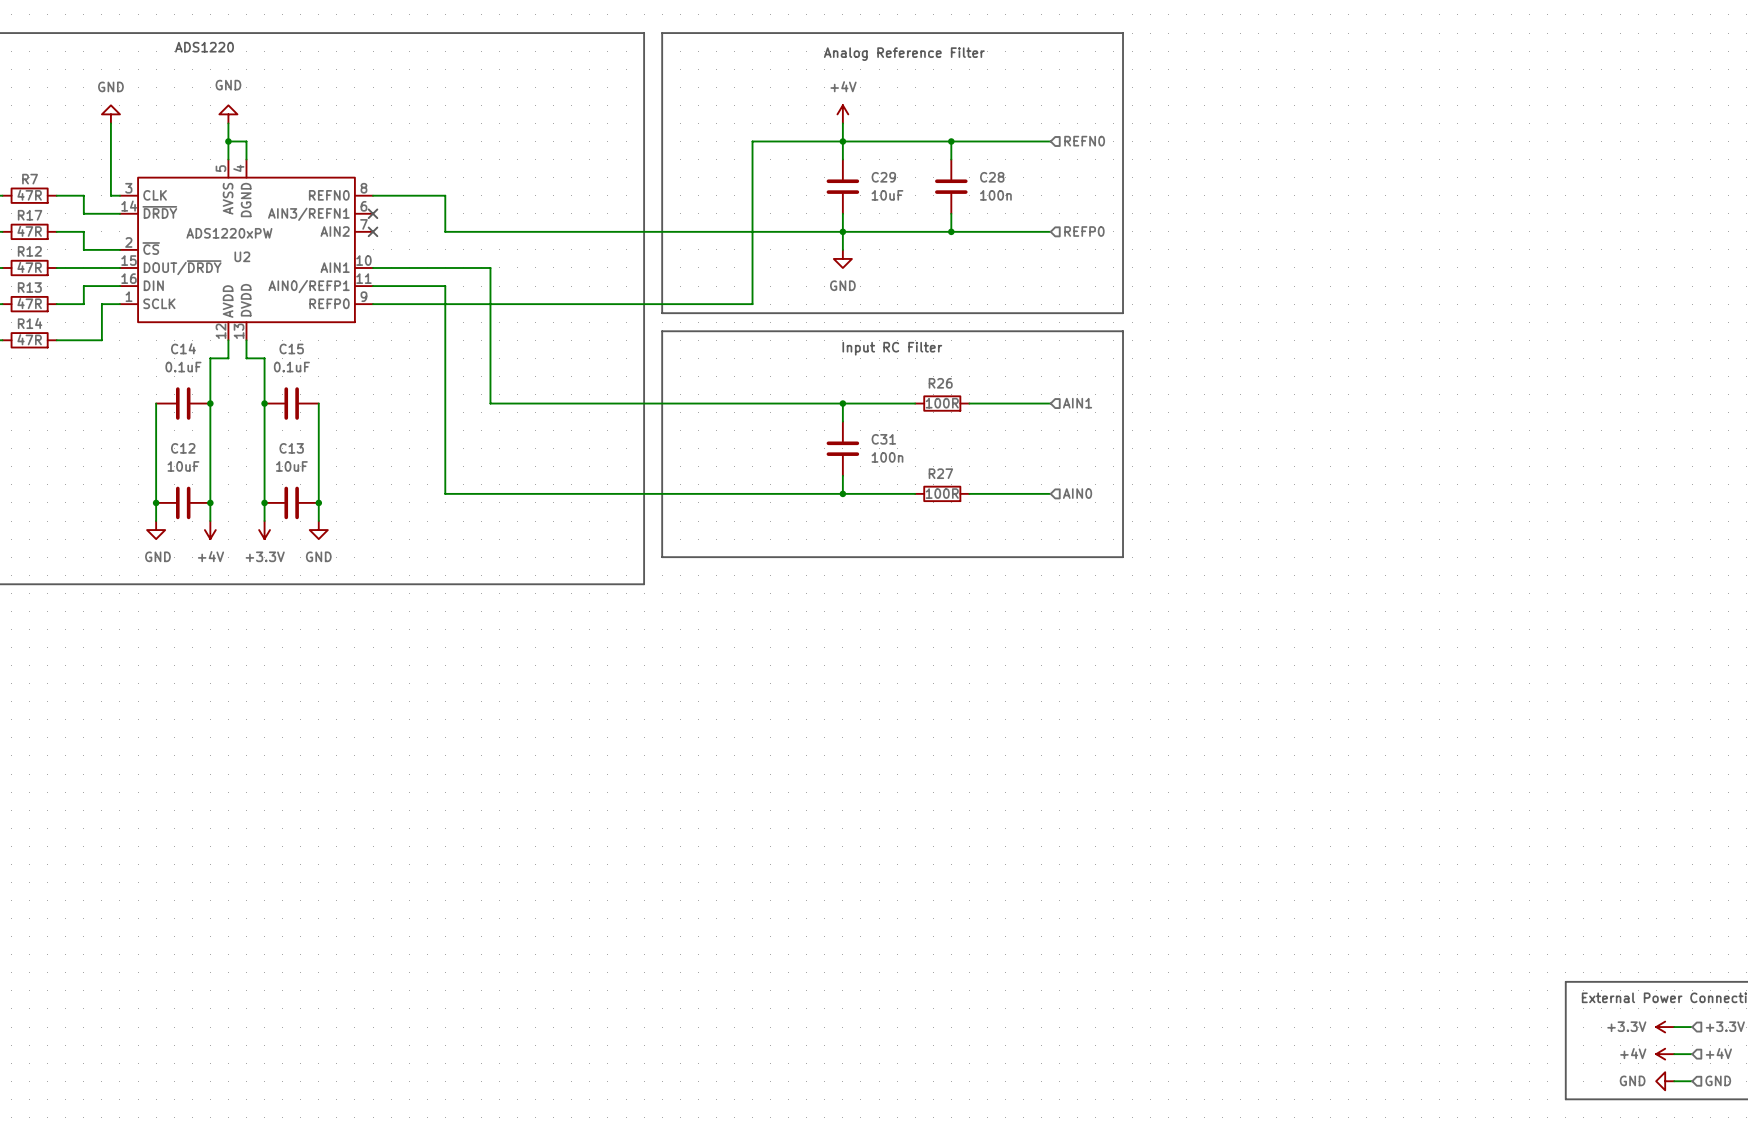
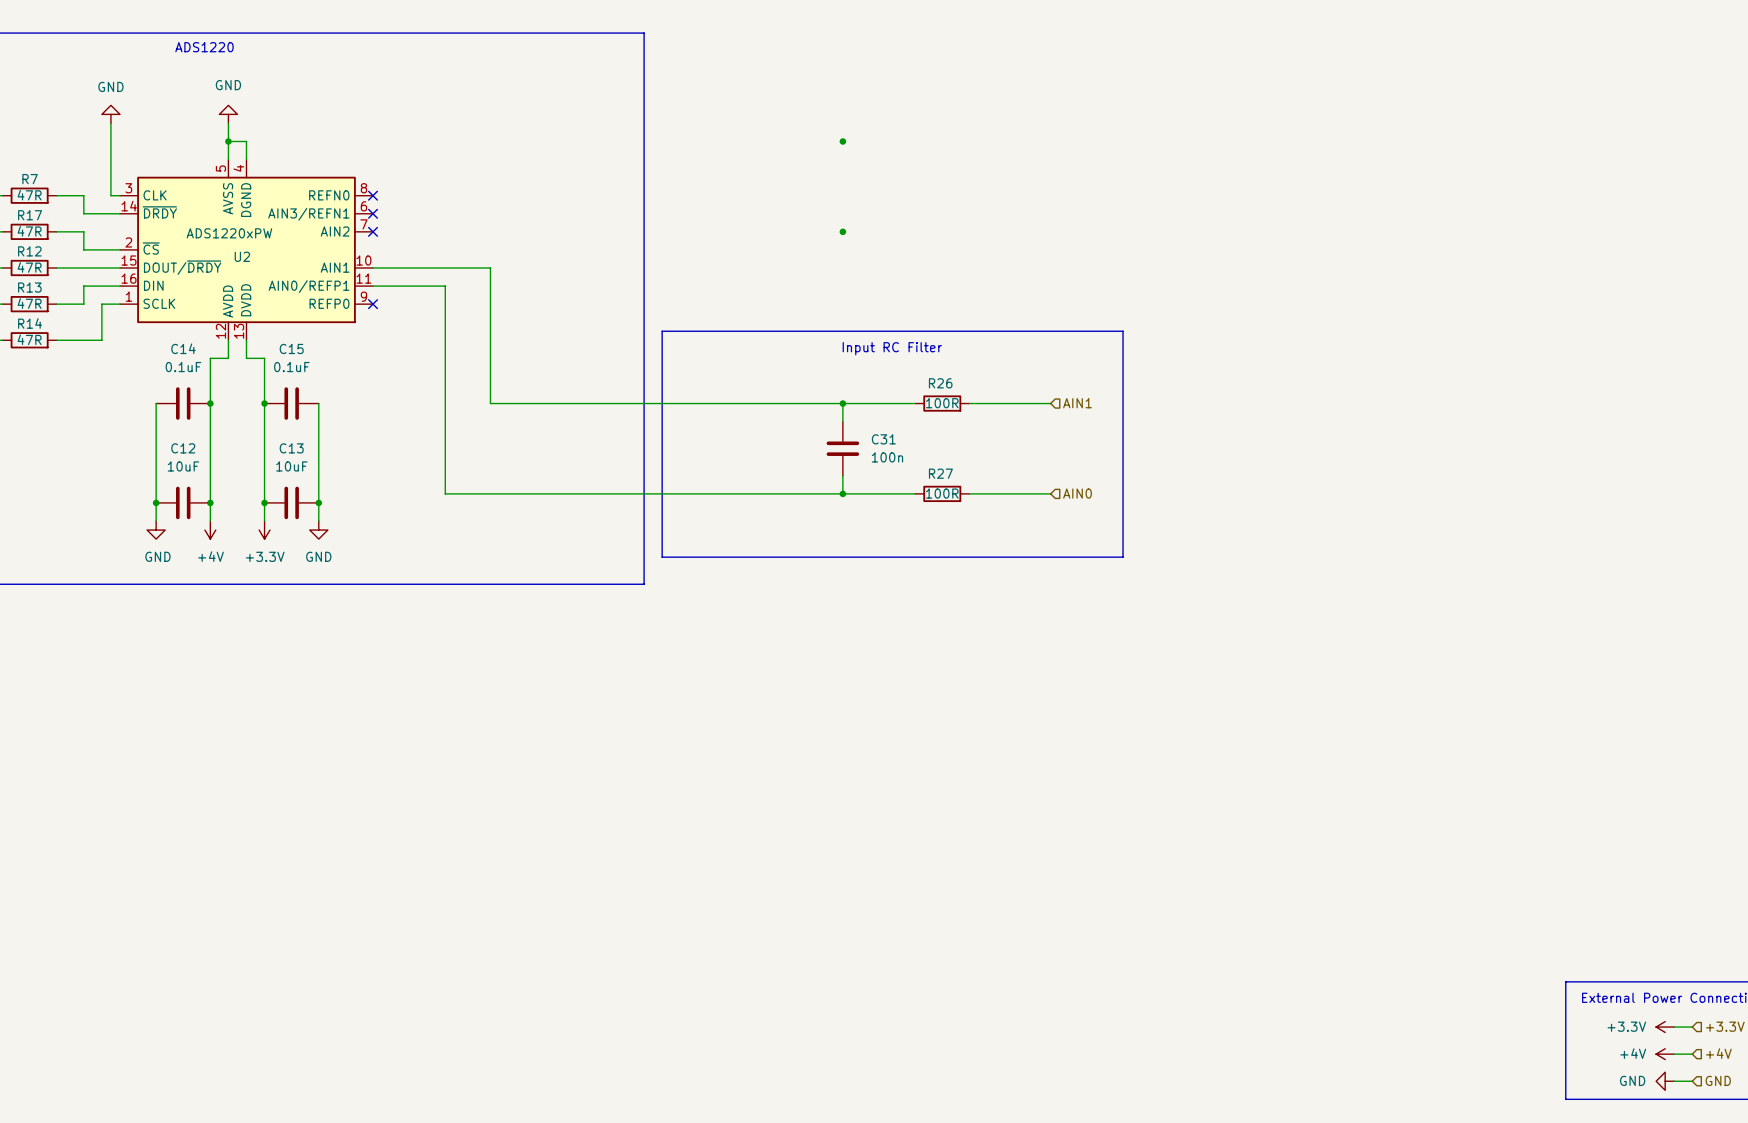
line: (662, 33) (1123, 33) (1123, 313) (662, 313) (662, 33) -> none
text: Analog Reference Filter (904, 54) -> none
power symbol: +4V (842, 114) -> none
wire: (842, 123) (842, 159) -> none
wire: (951, 141) (951, 159) -> none
junction: (951, 141) -> none
wire: (1050, 141) (752, 141) (752, 304) (373, 304) -> none
hierarchical label: REFN0 (1084, 141) -> none
C29: 10uF (842, 186) -> none
C28: 100n (951, 186) -> none
wire: (373, 195) (445, 195) (445, 231) (1050, 231) -> none
no-connect mark: none -> (373, 195)
wire: (842, 213) (842, 249) -> none
wire: (951, 213) (951, 231) -> none
junction: (951, 231) -> none
hierarchical label: REFP0 (1084, 231) -> none
power symbol: GND (842, 258) -> none
no-connect mark: none -> (373, 304)

